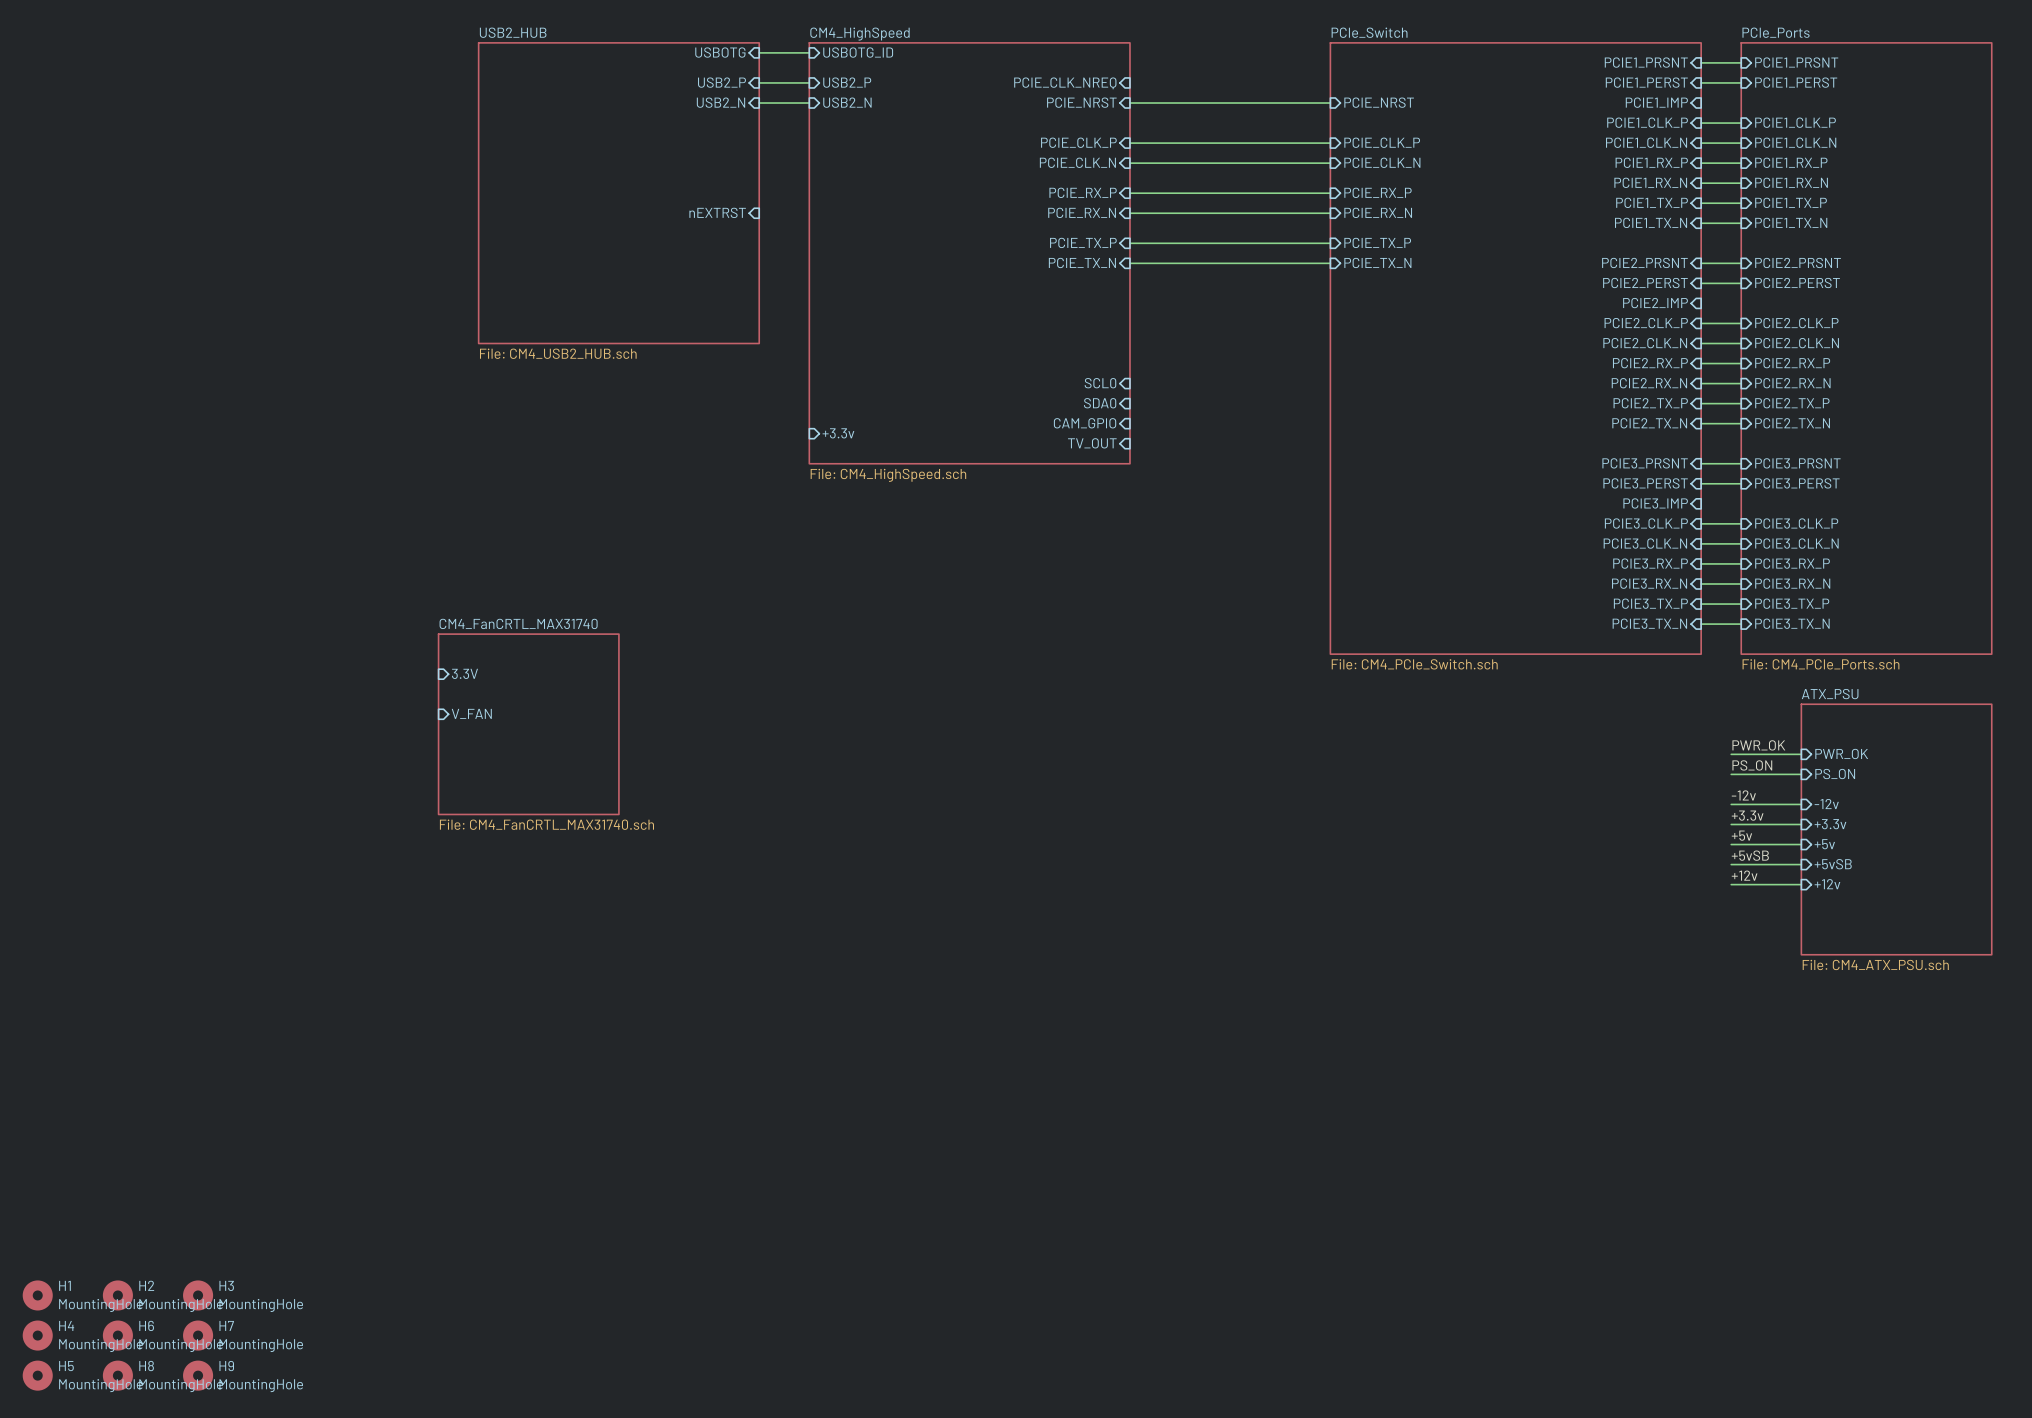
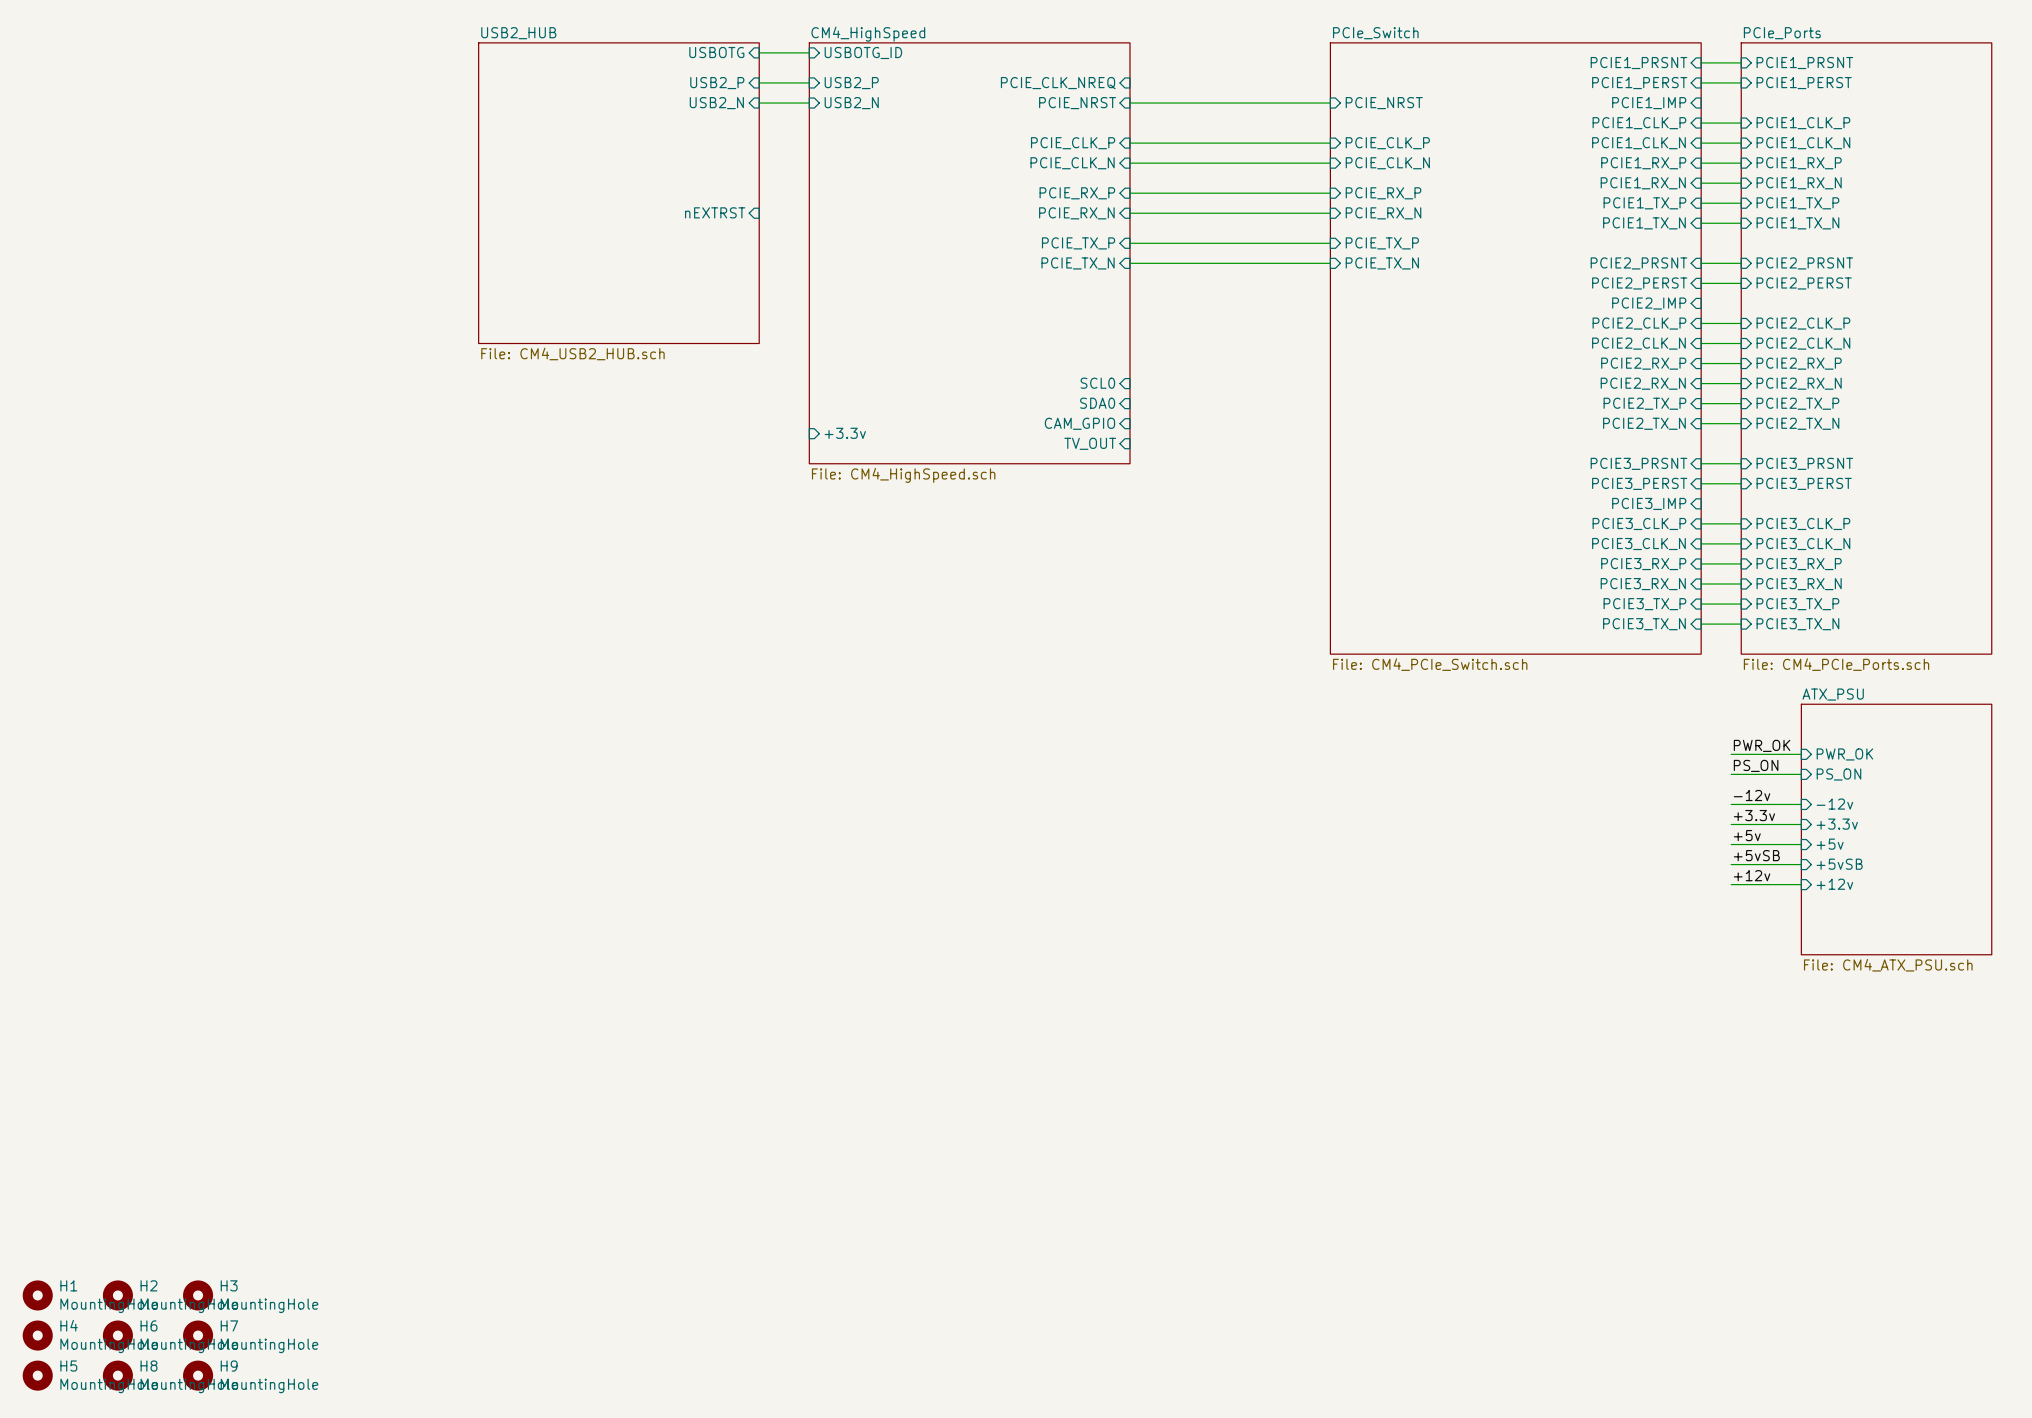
sheet pin: 3.3V (464, 673) -> none
sheet pin: V_FAN (471, 713) -> none
sheet CM4_FanCRTL_MAX31740: File: CM4_FanCRTL_MAX31740.sch (528, 724) -> none

